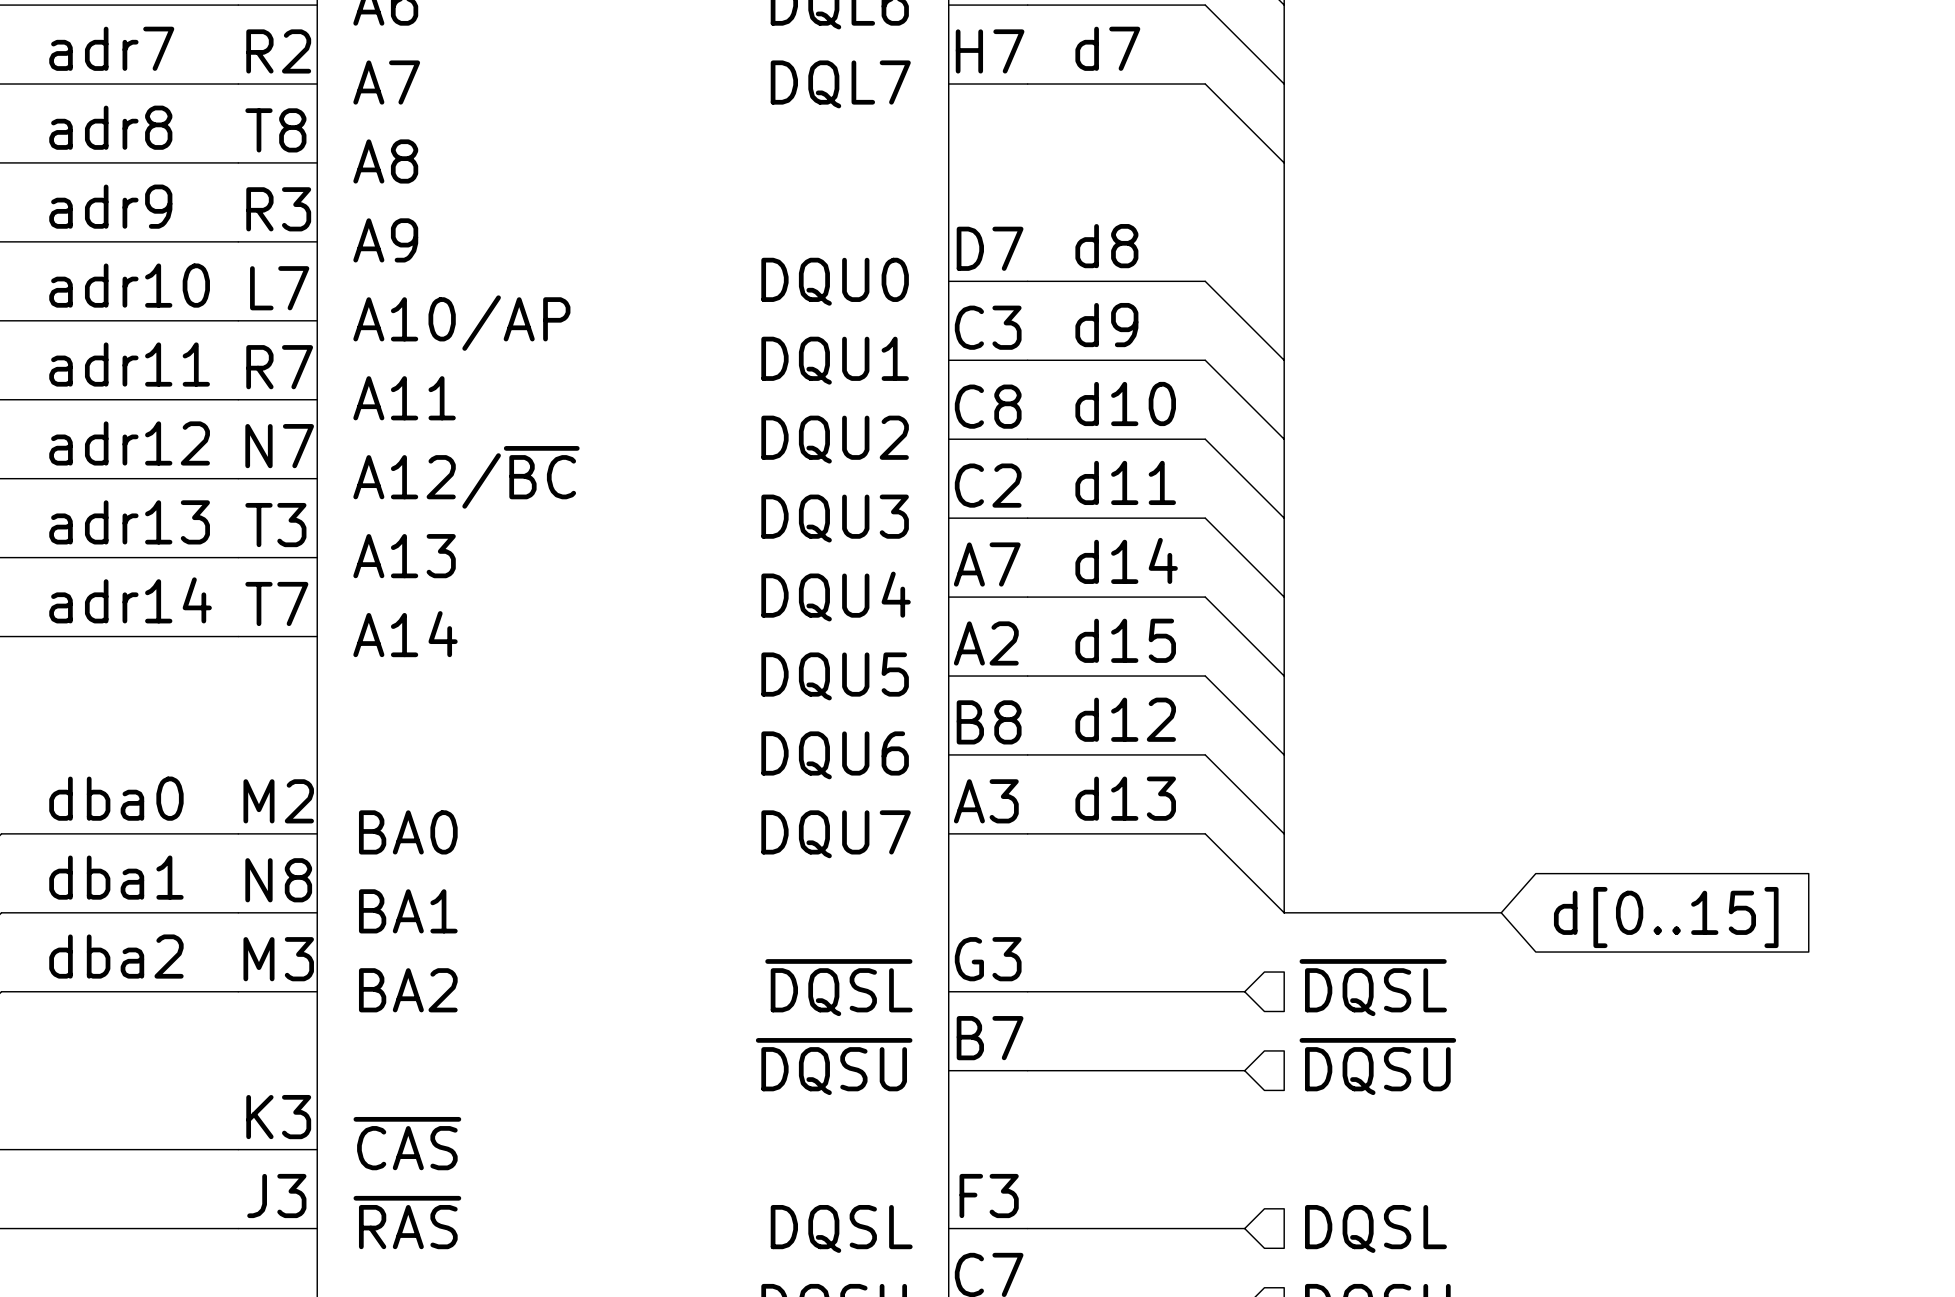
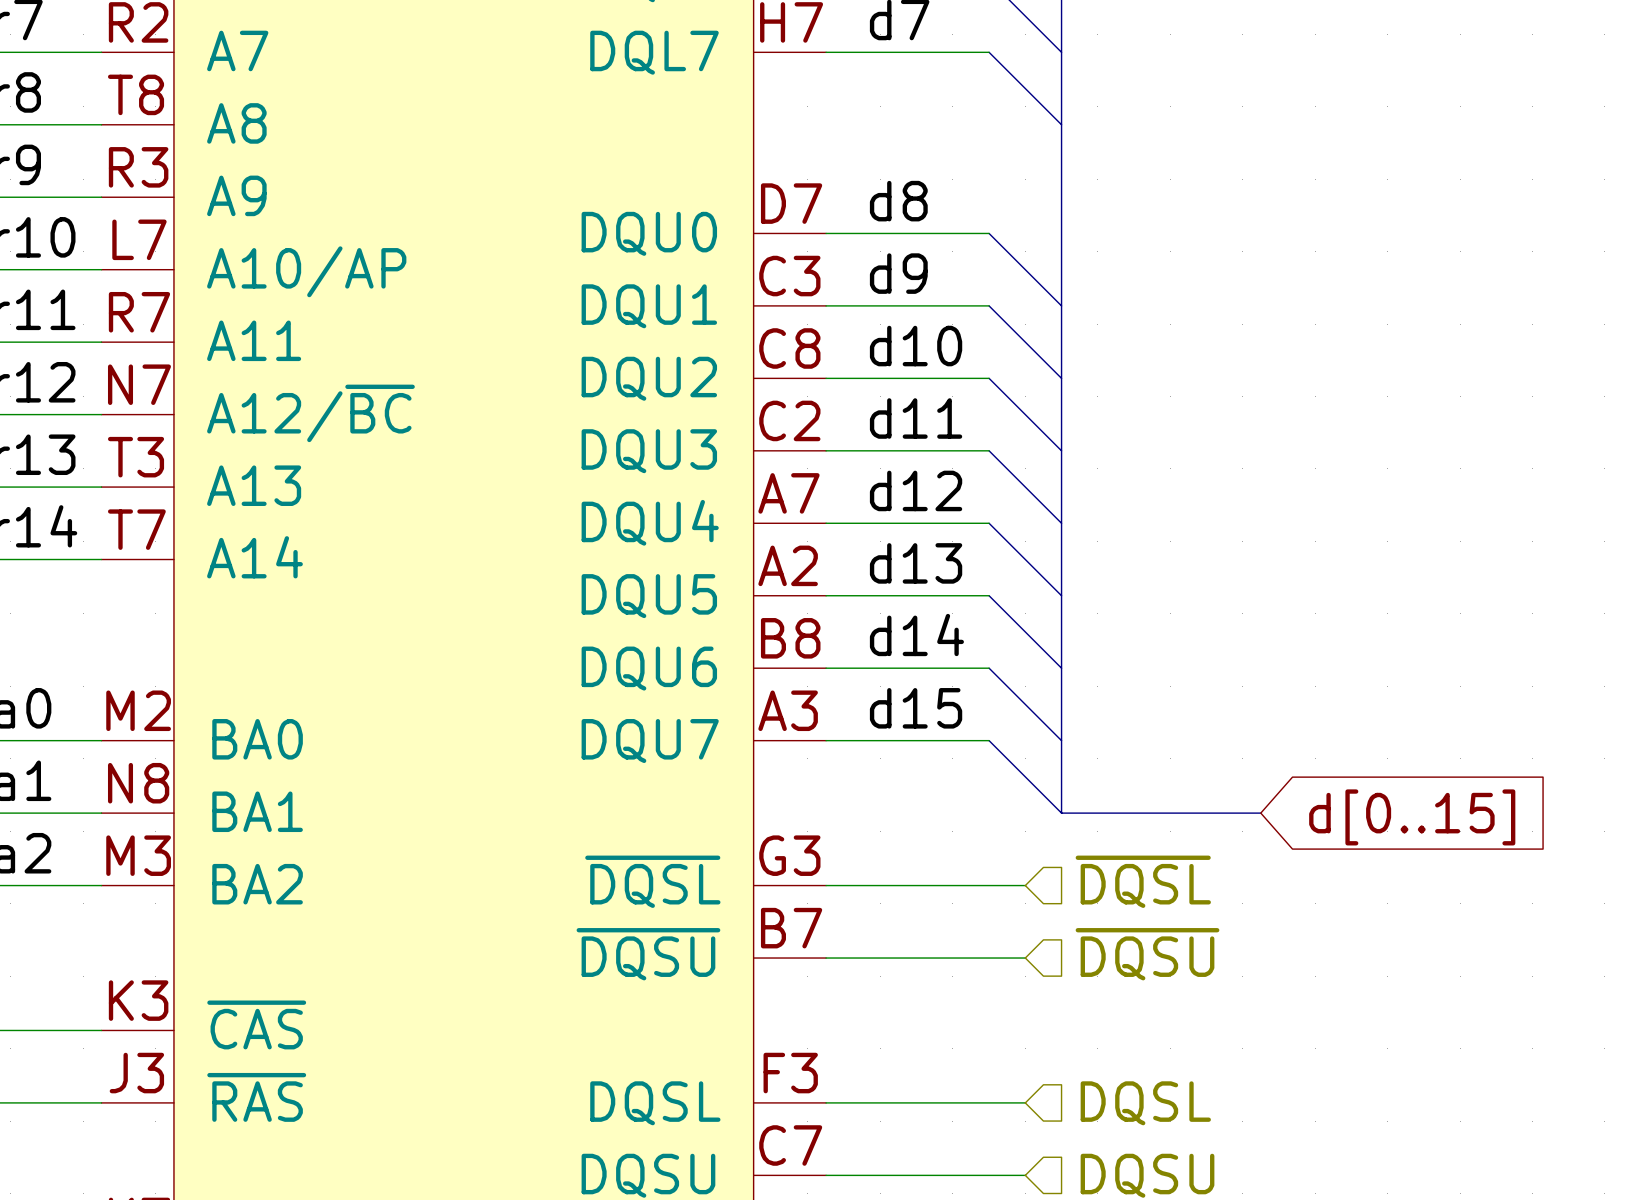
label: d14 (1126, 560) -> d12 (916, 490)
label: d15 (1125, 640) -> d13 (916, 563)
label: d12 (1125, 719) -> d14 (916, 635)
label: d13 (1125, 798) -> d15 (916, 708)

